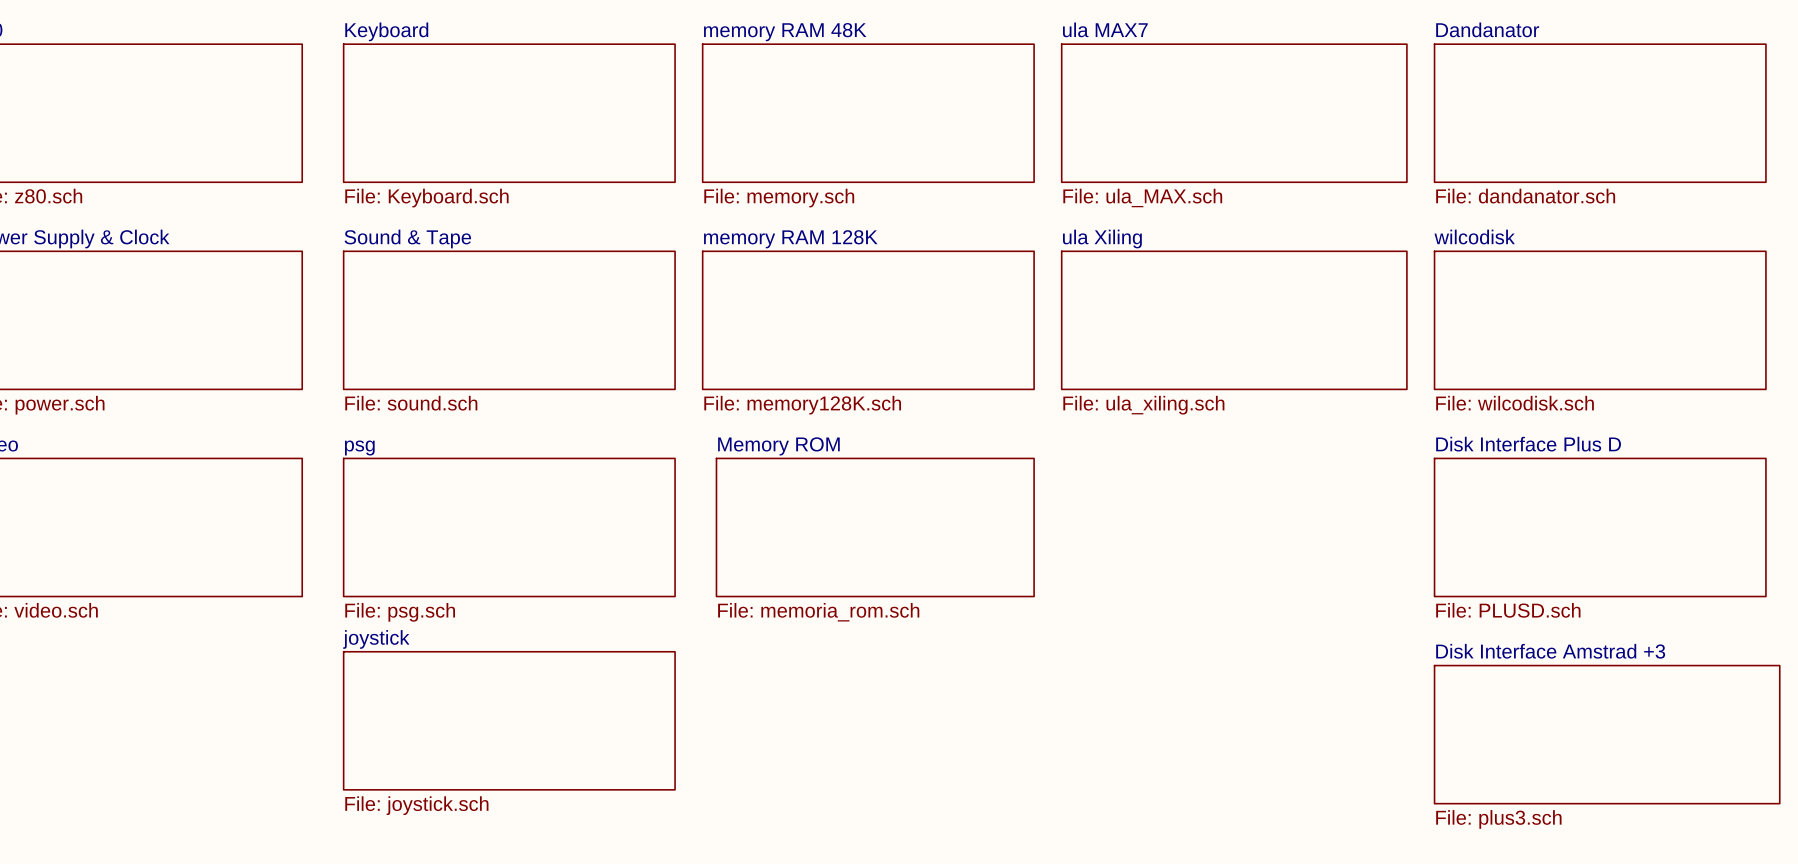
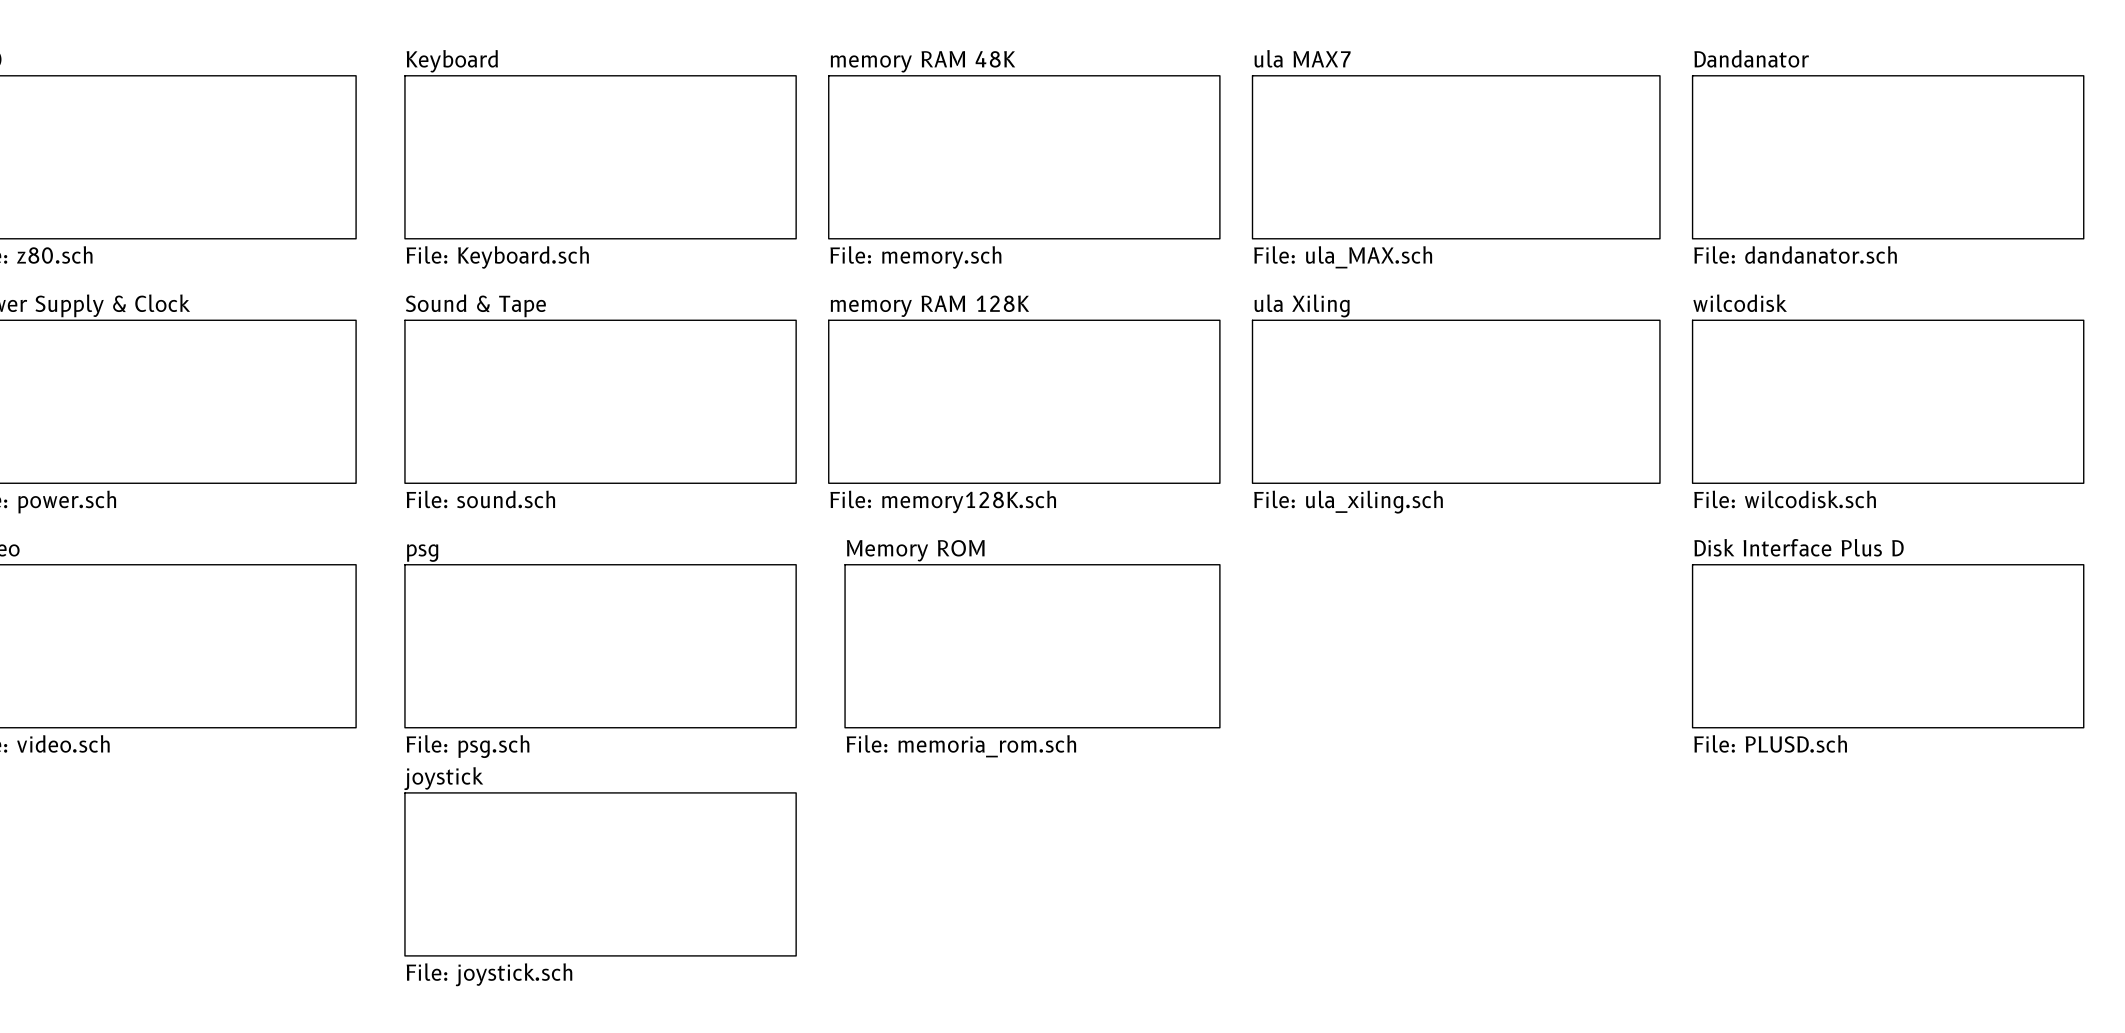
sheet Disk Interface Amstrad +3: File: plus3.sch (1607, 734) -> none

